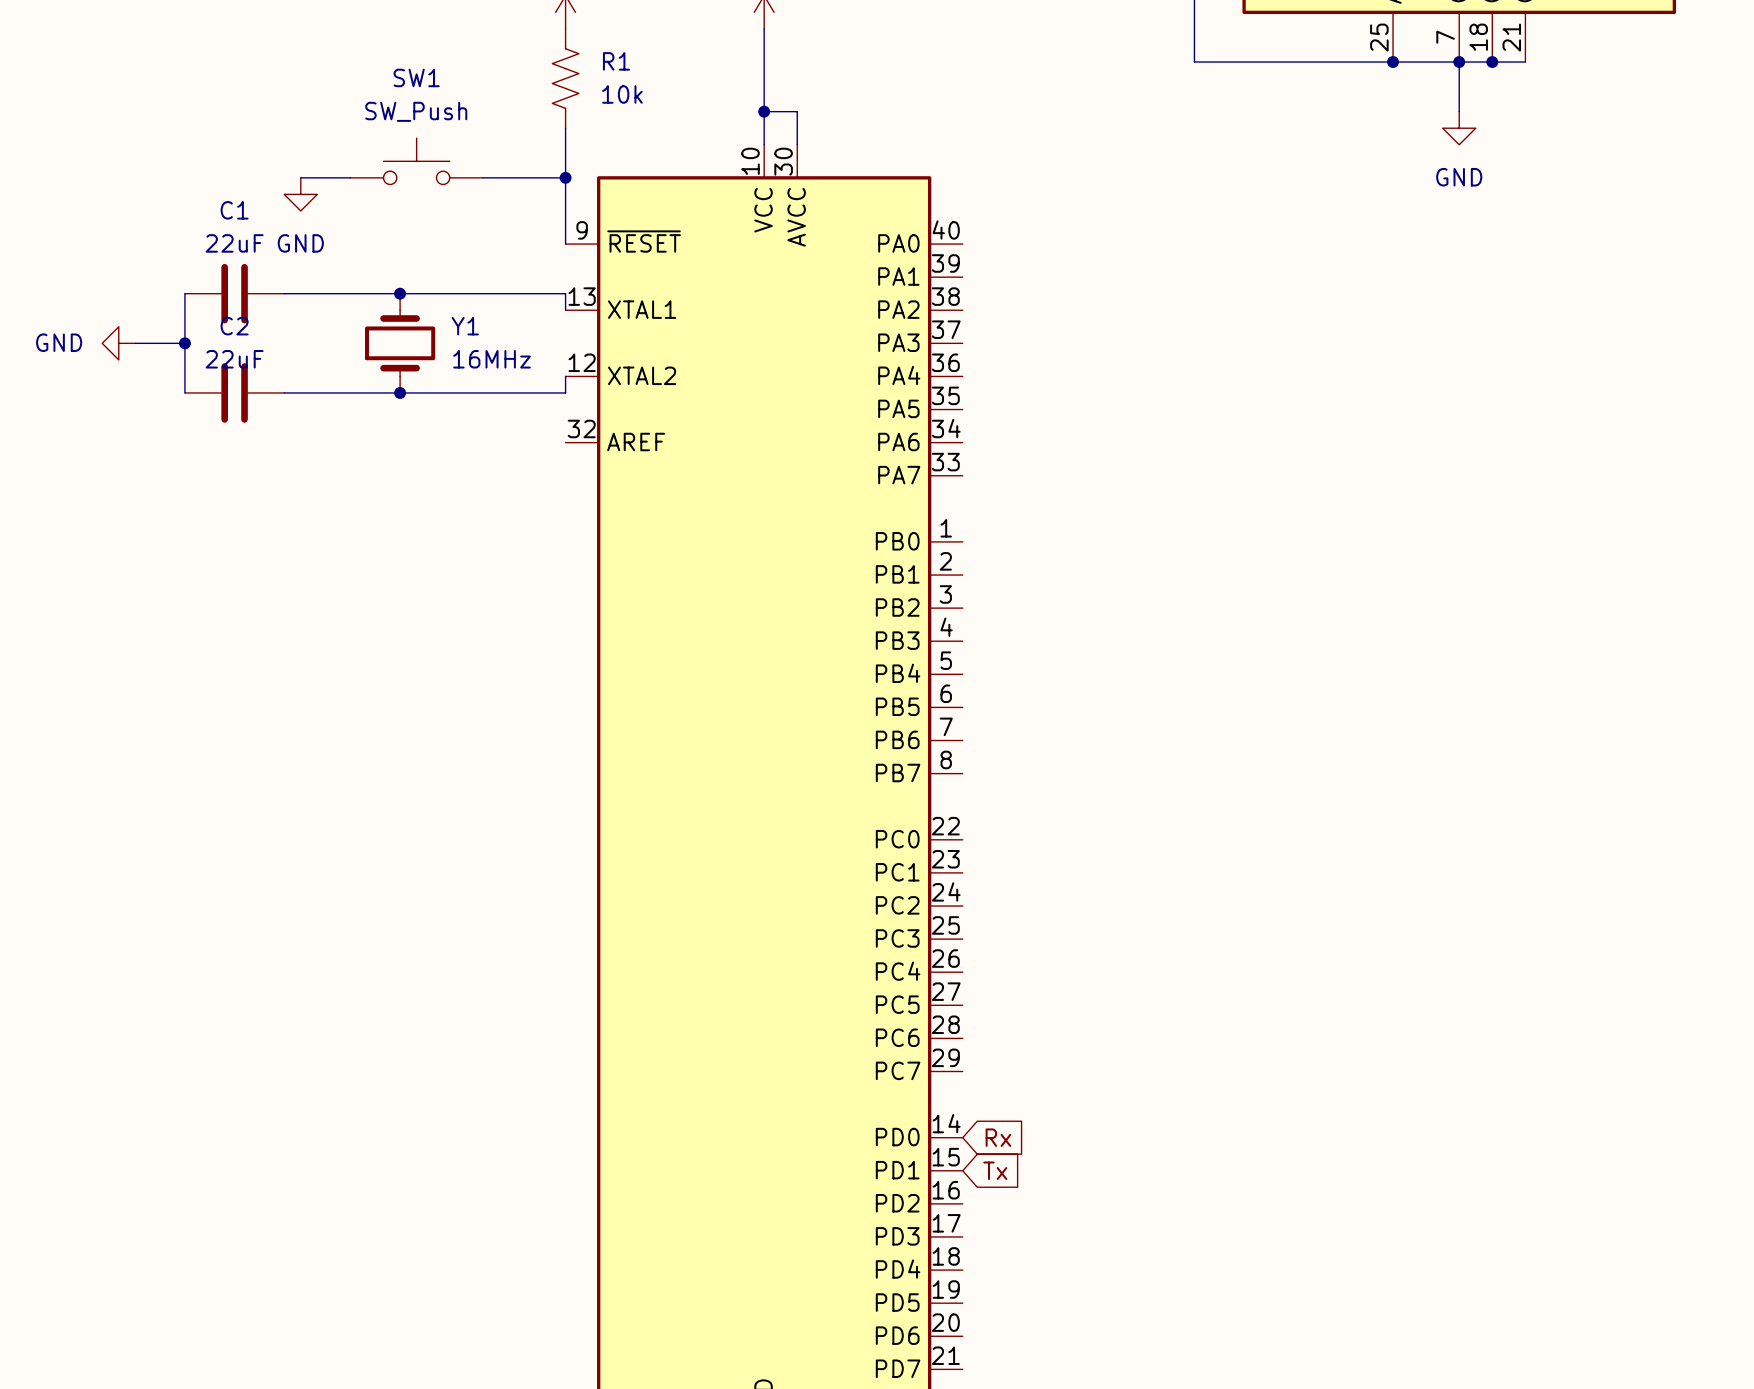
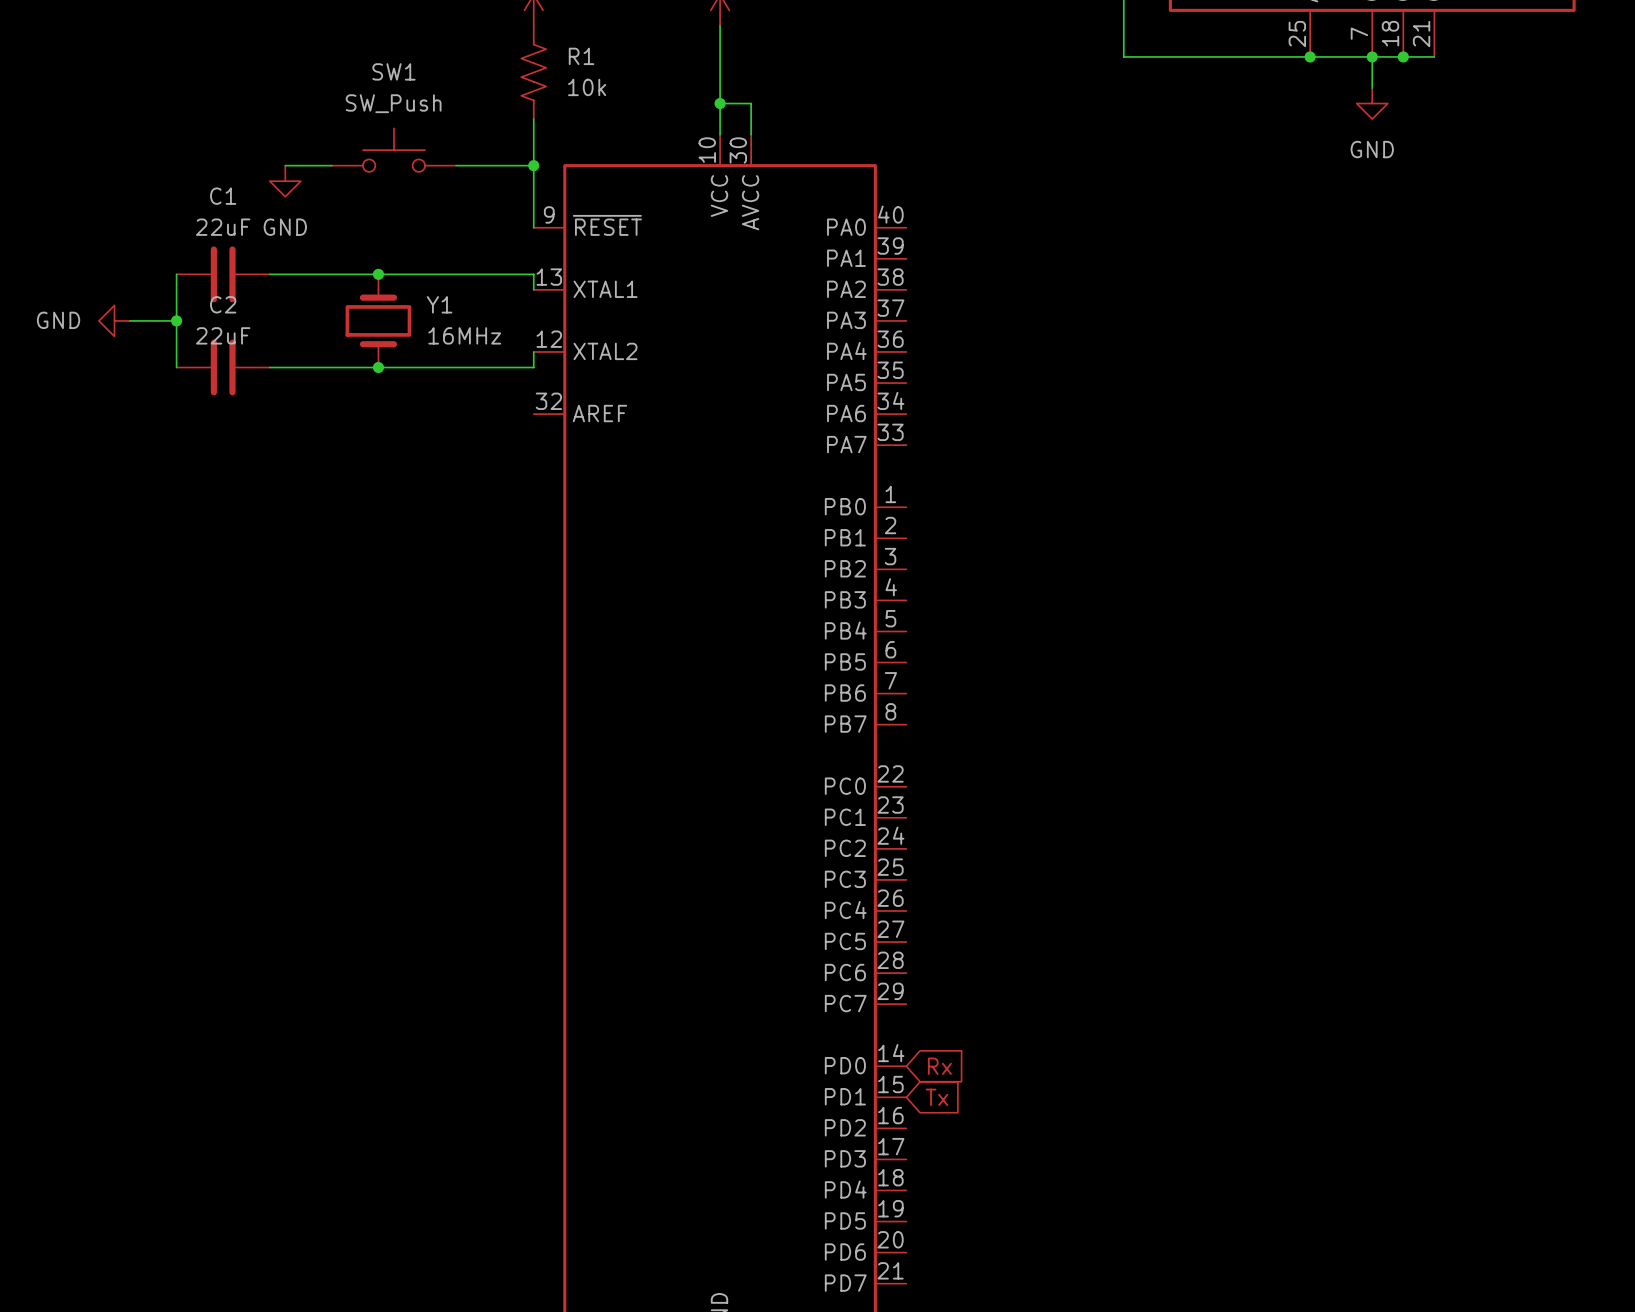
power symbol position: GND (1459, 128) -> GND (1372, 103)

